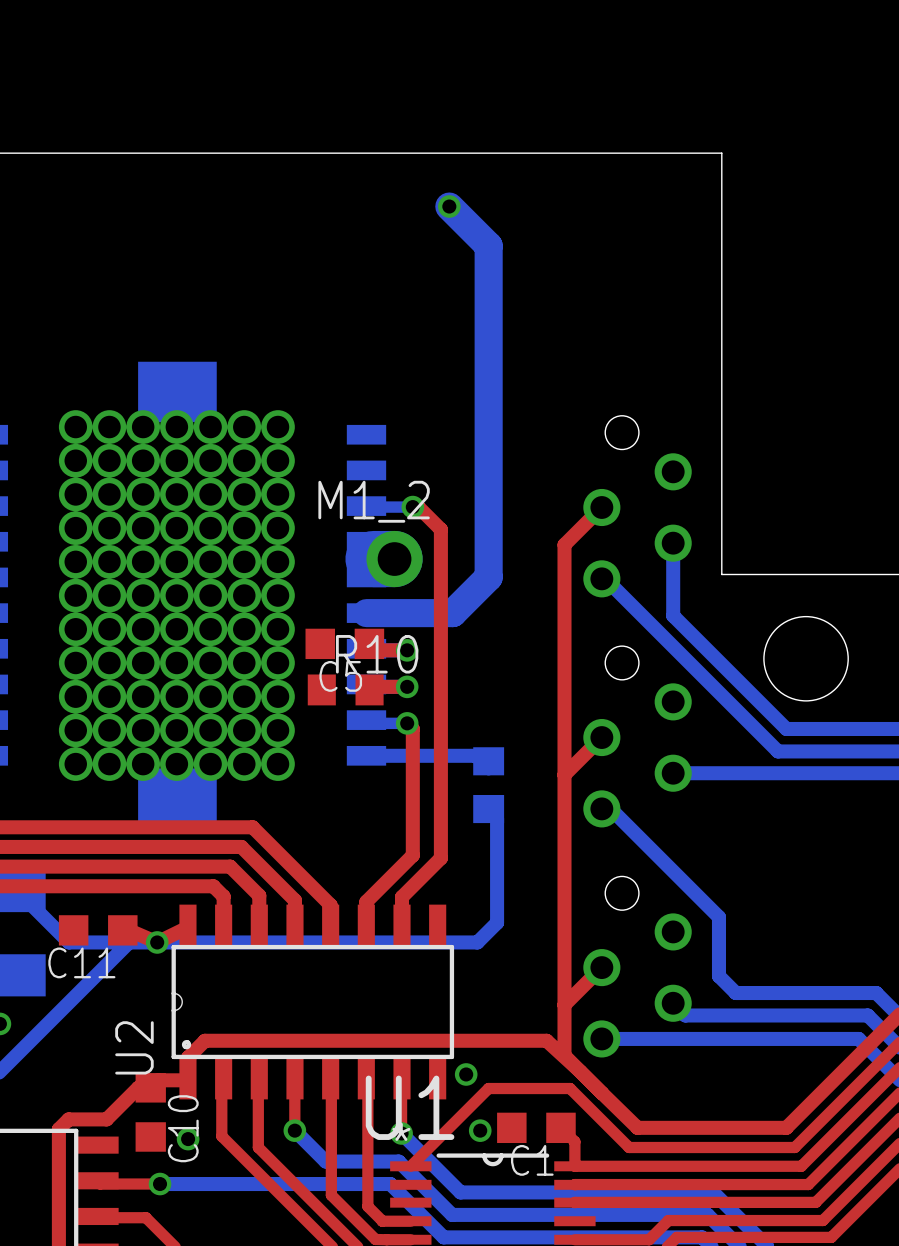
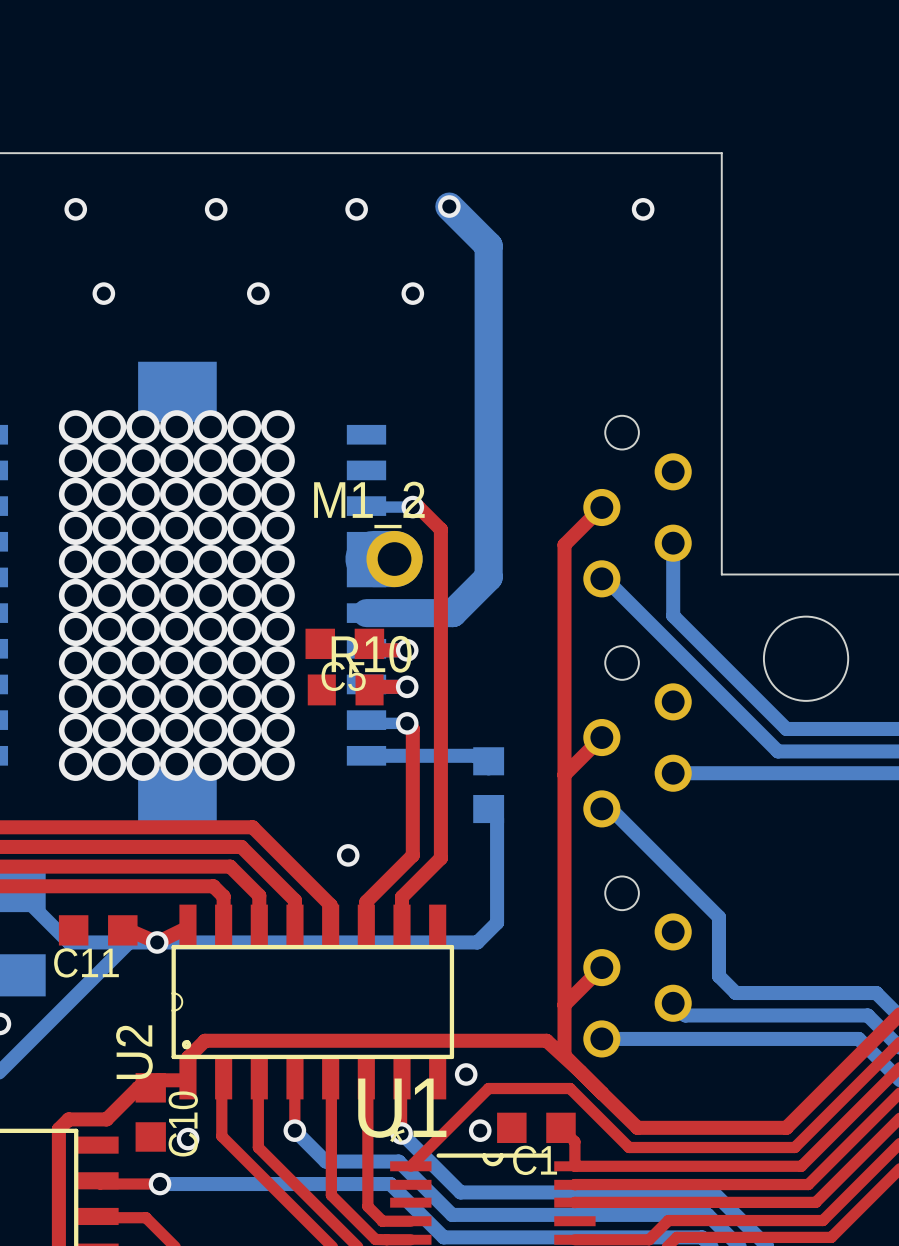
via: none -> (75, 209)
via: none -> (216, 209)
via: none -> (356, 209)
via: none -> (643, 209)
via: none -> (103, 293)
via: none -> (258, 293)
via: none -> (412, 293)
via: none -> (348, 855)

